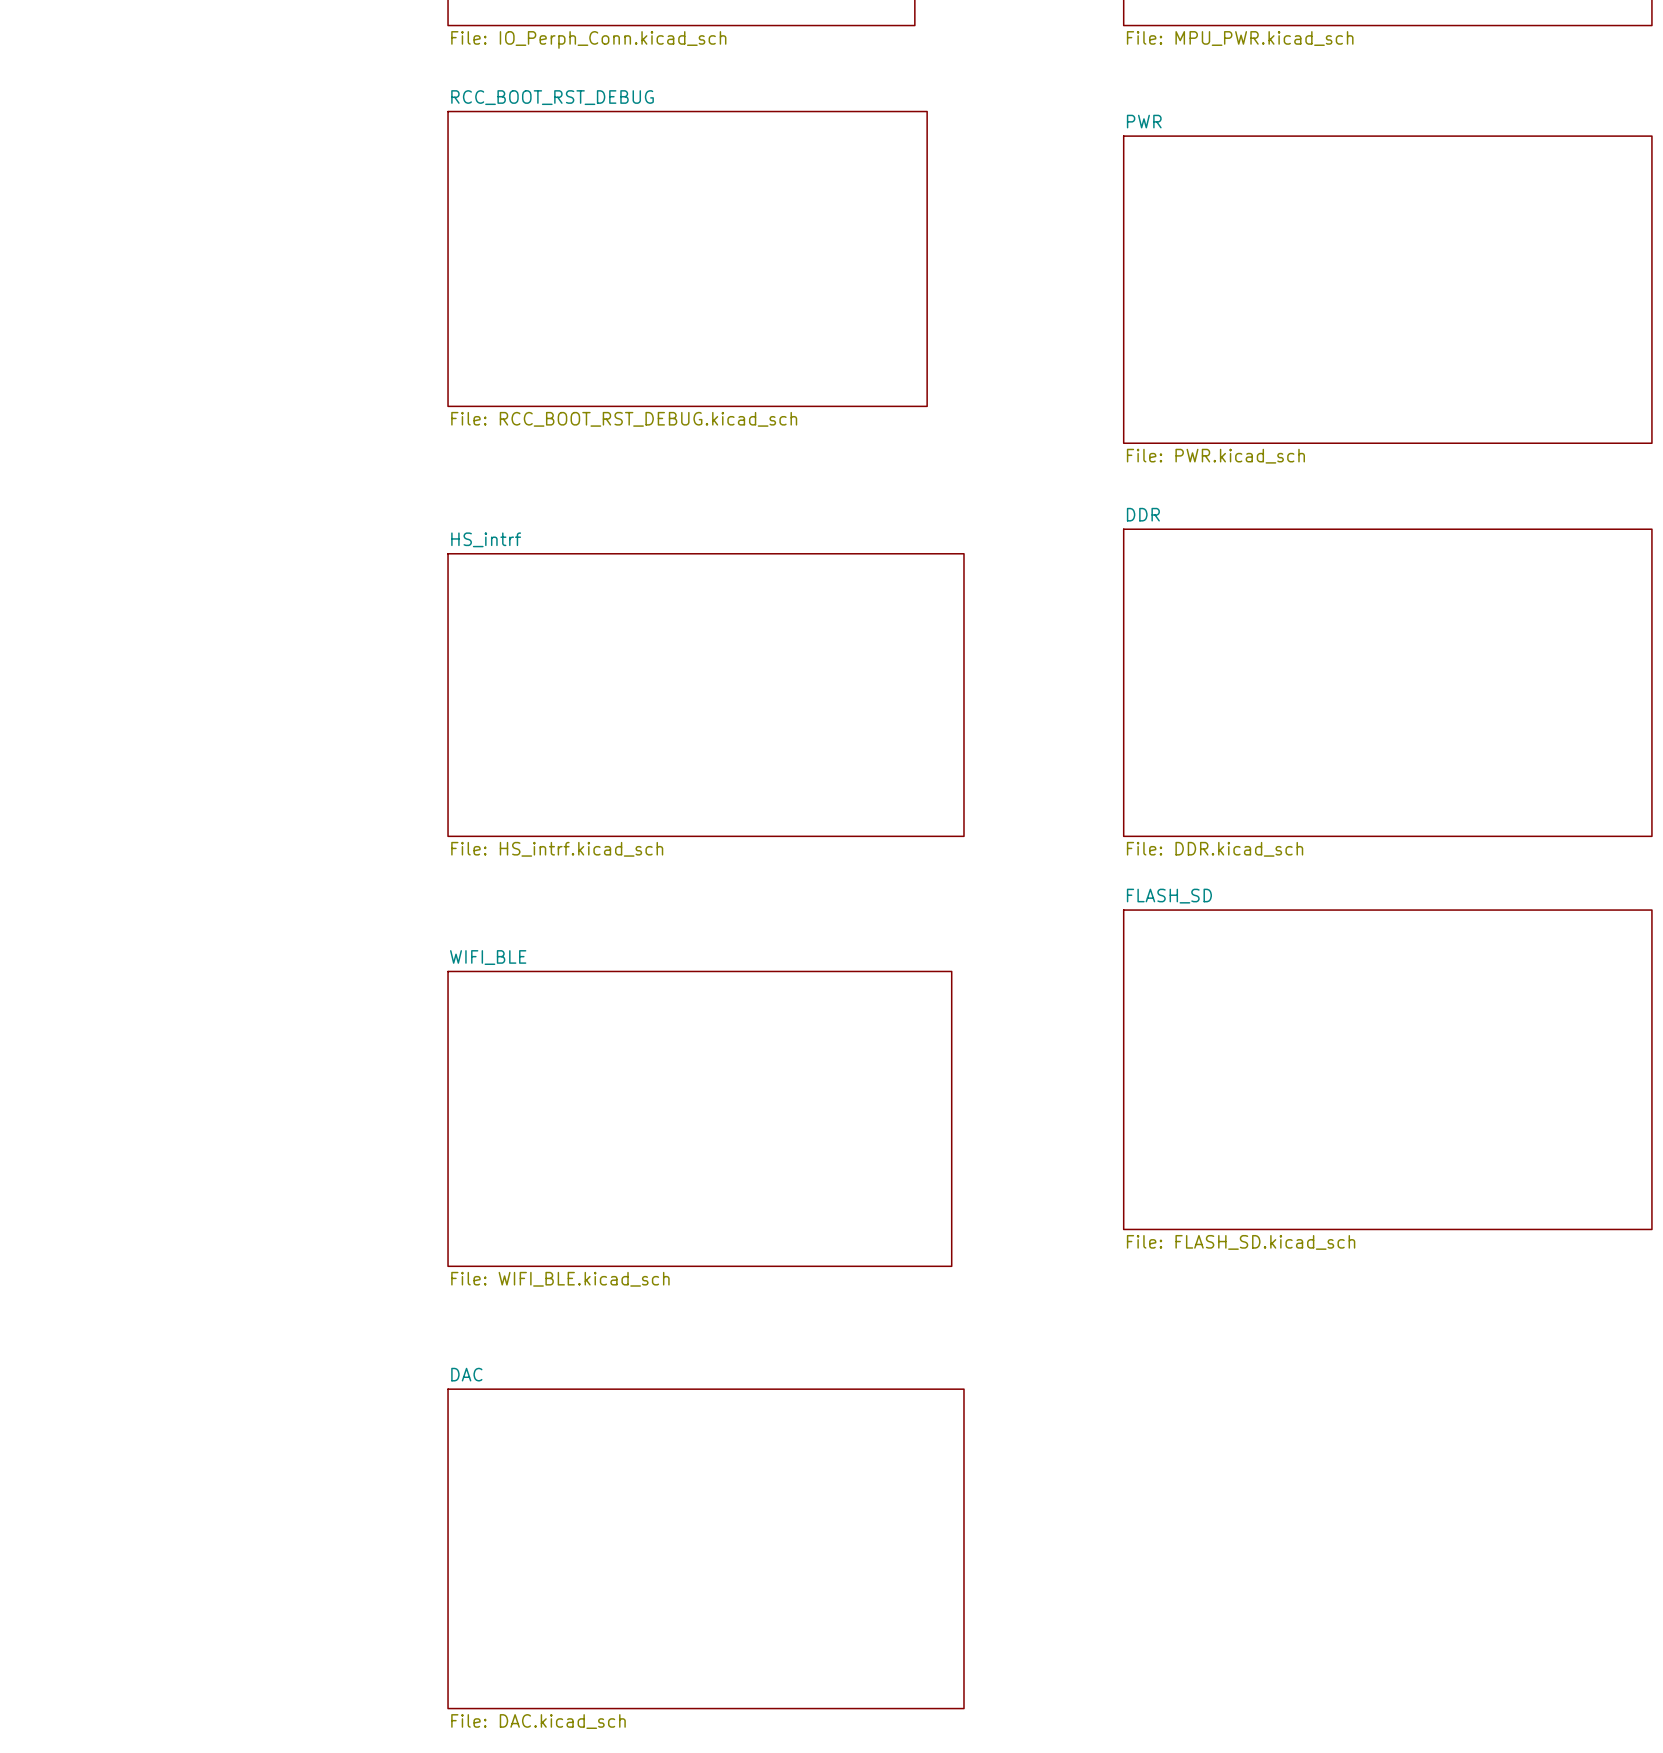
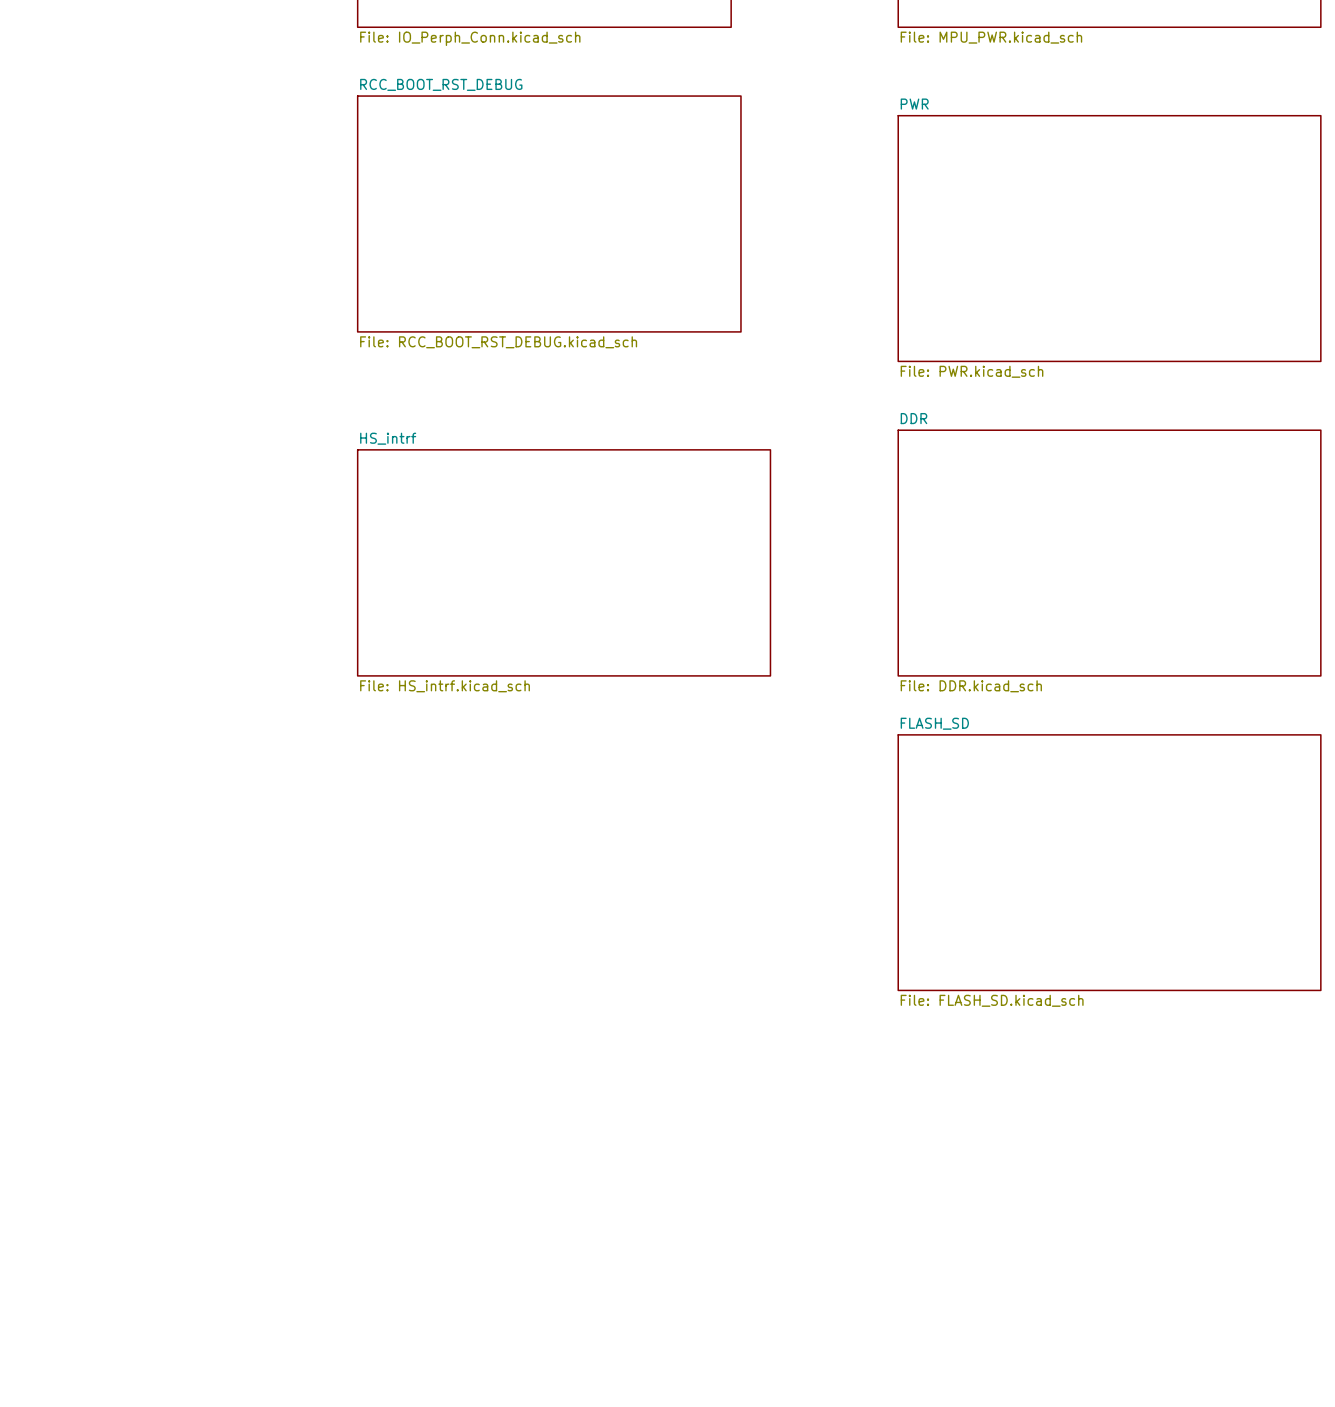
sheet WIFI_BLE: File: WIFI_BLE.kicad_sch (699, 1118) -> none
sheet DAC: File: DAC.kicad_sch (706, 1548) -> none

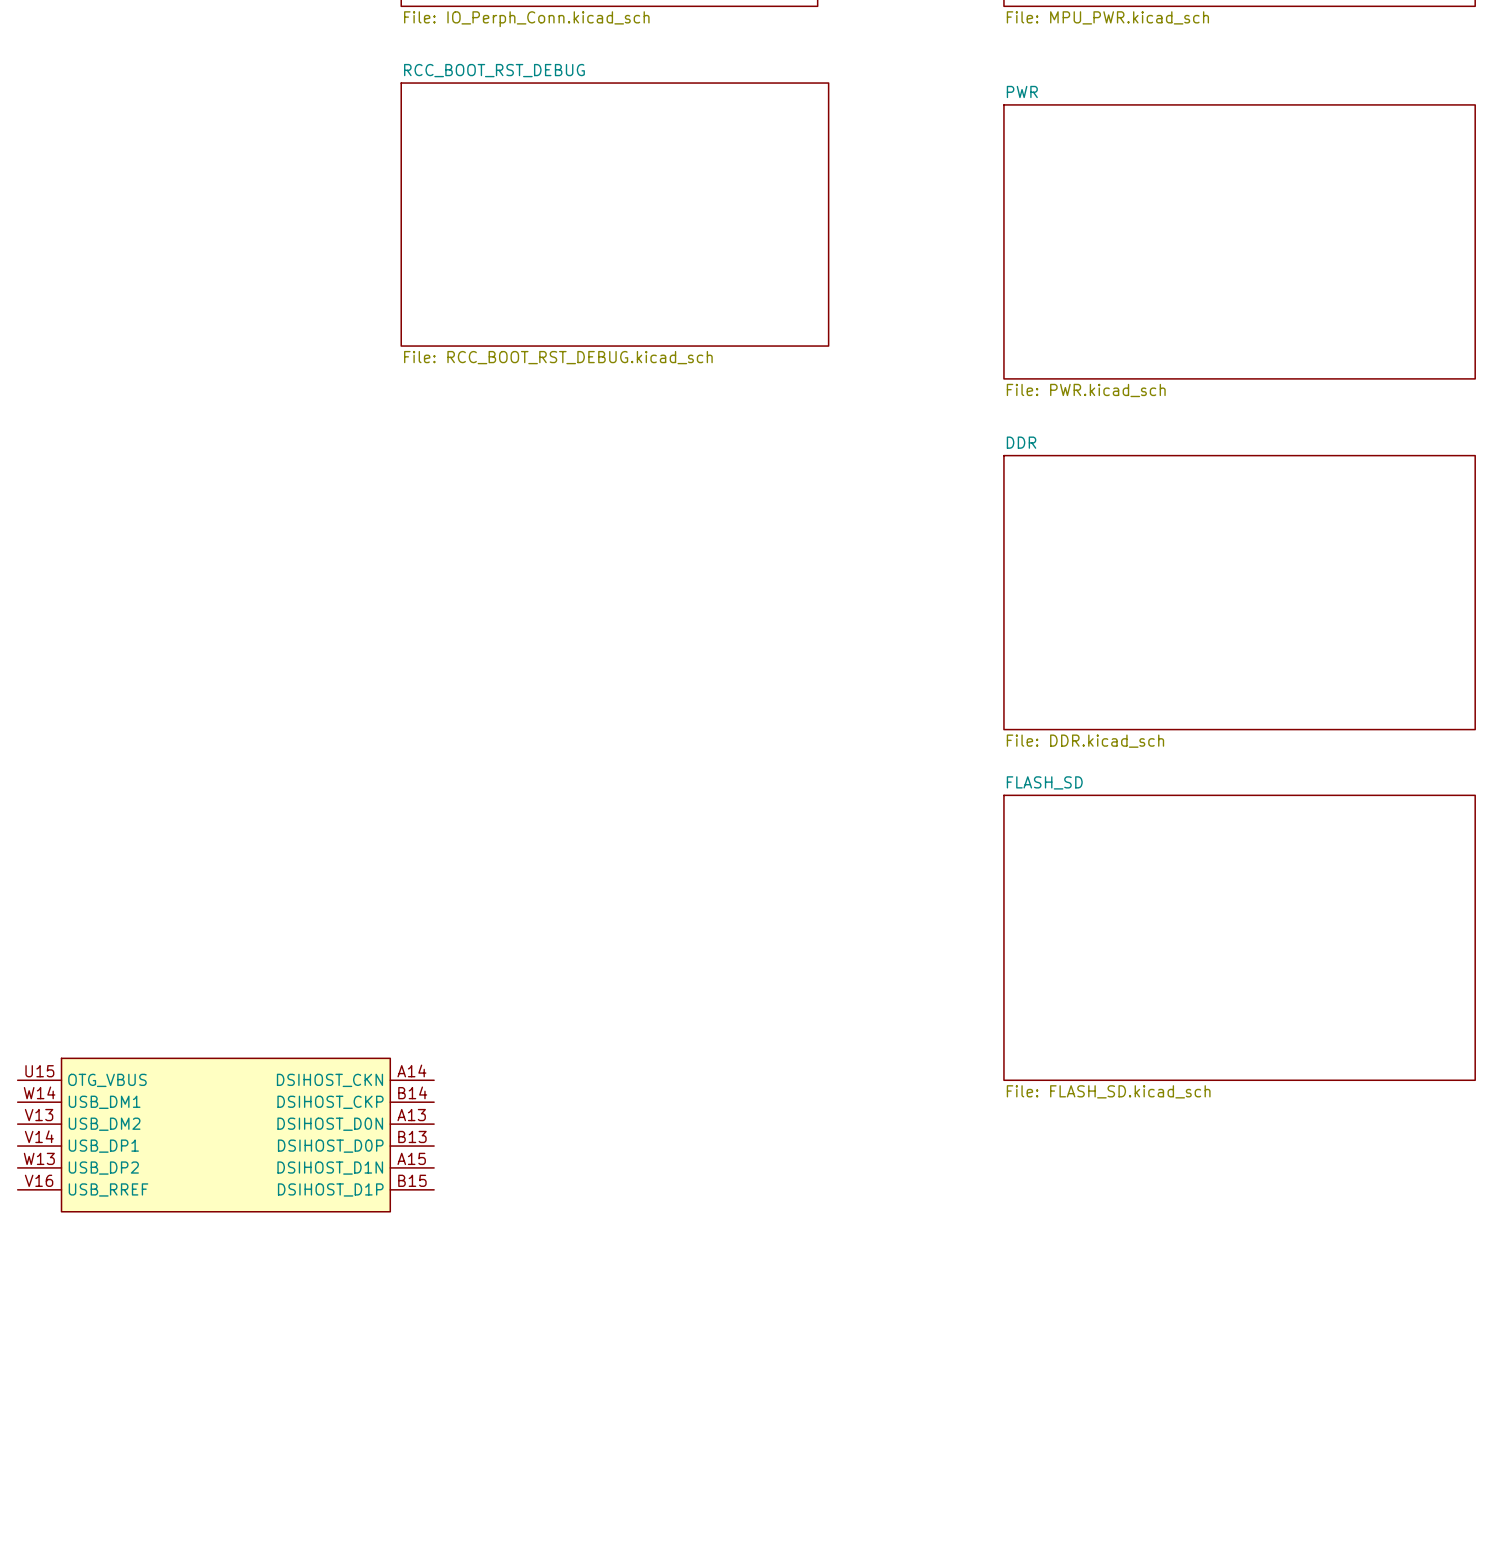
sheet HS_intrf: File: HS_intrf.kicad_sch (564, 562) -> none
part: none -> (225, 1135)

